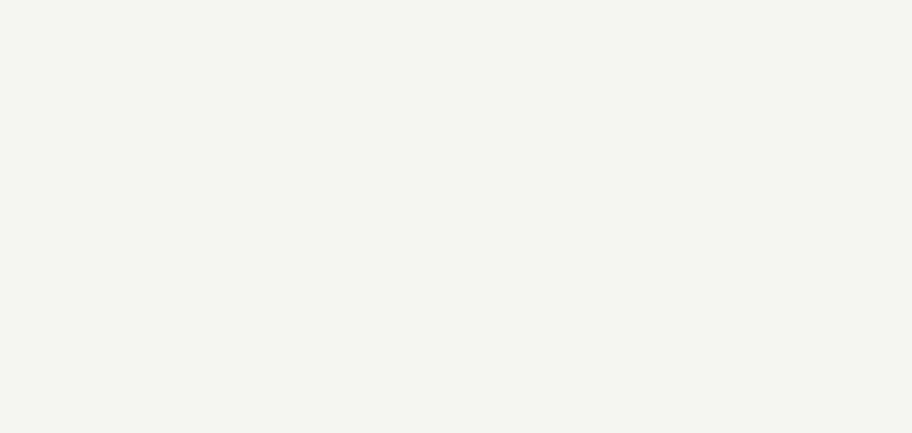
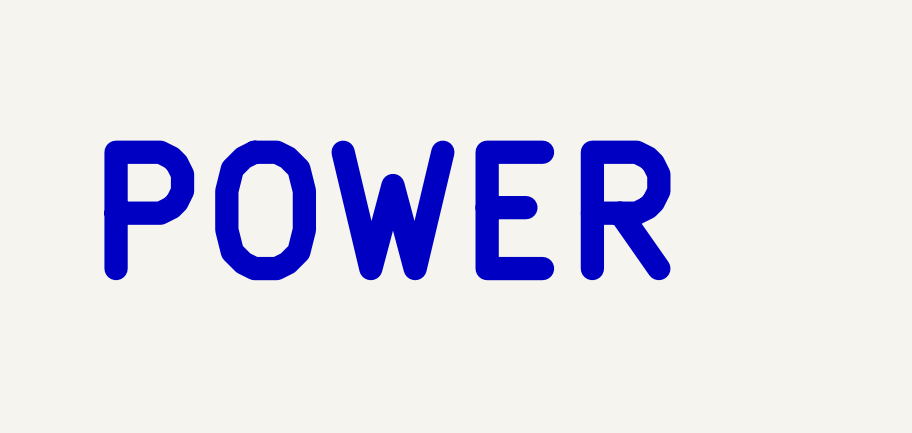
text: none -> POWER (387, 210)

